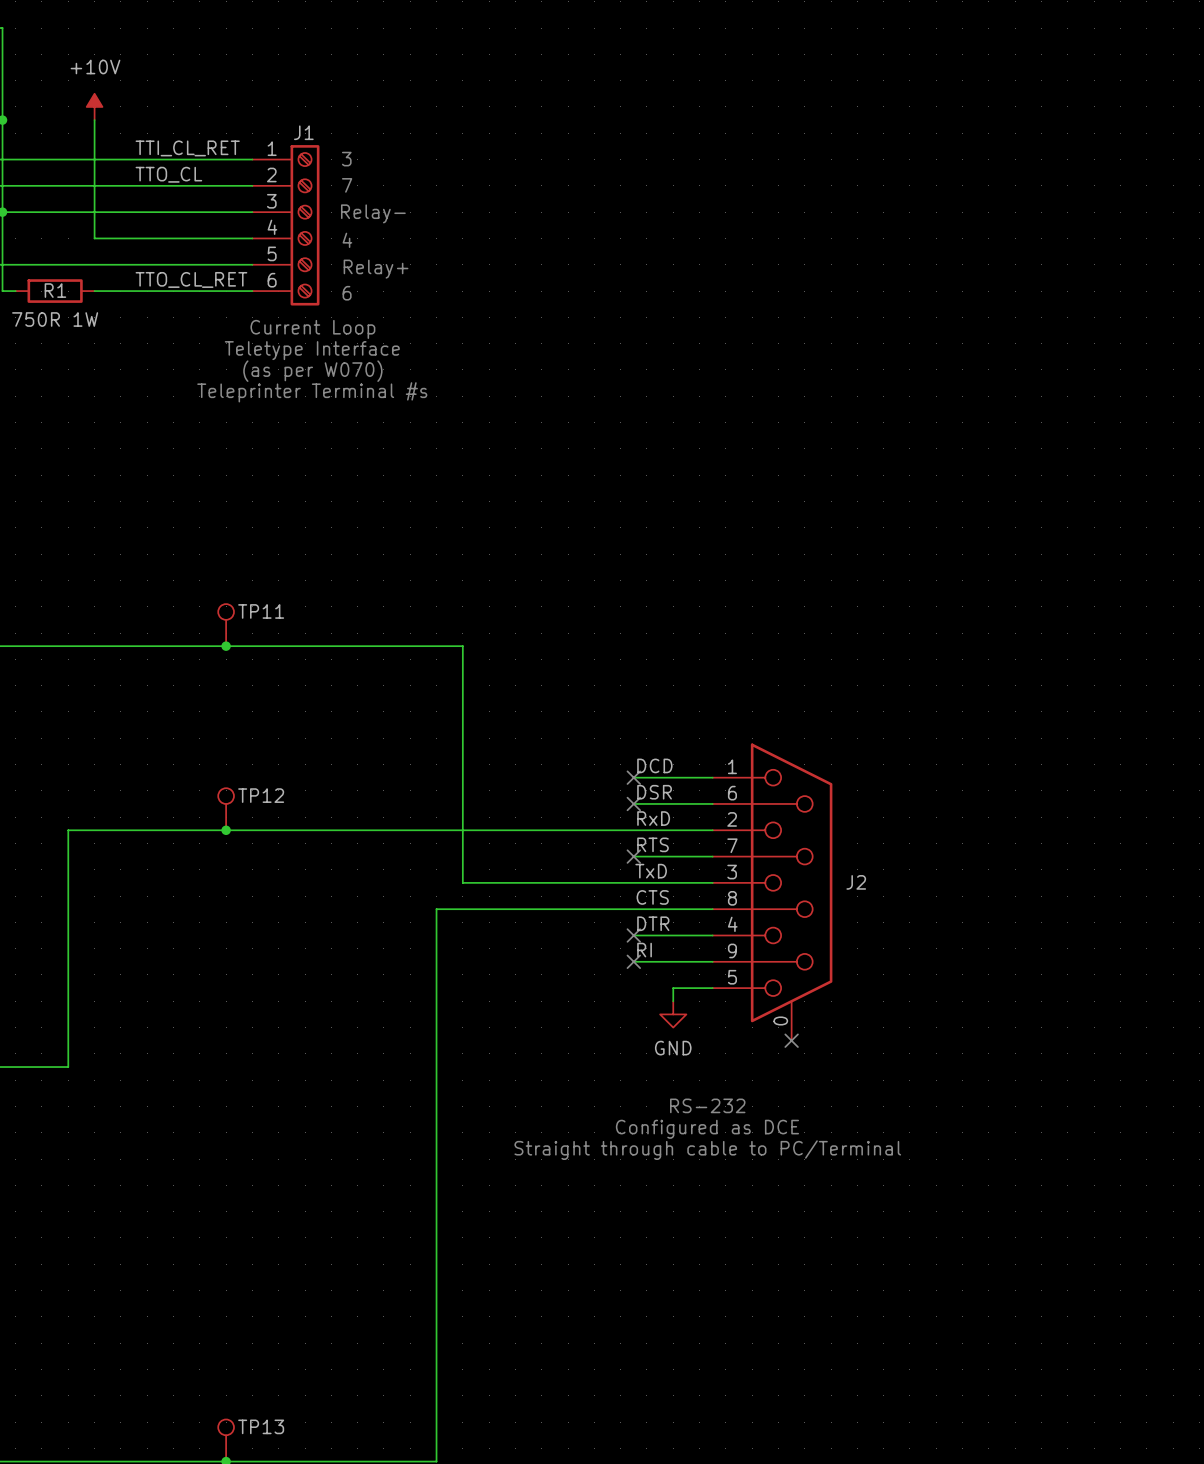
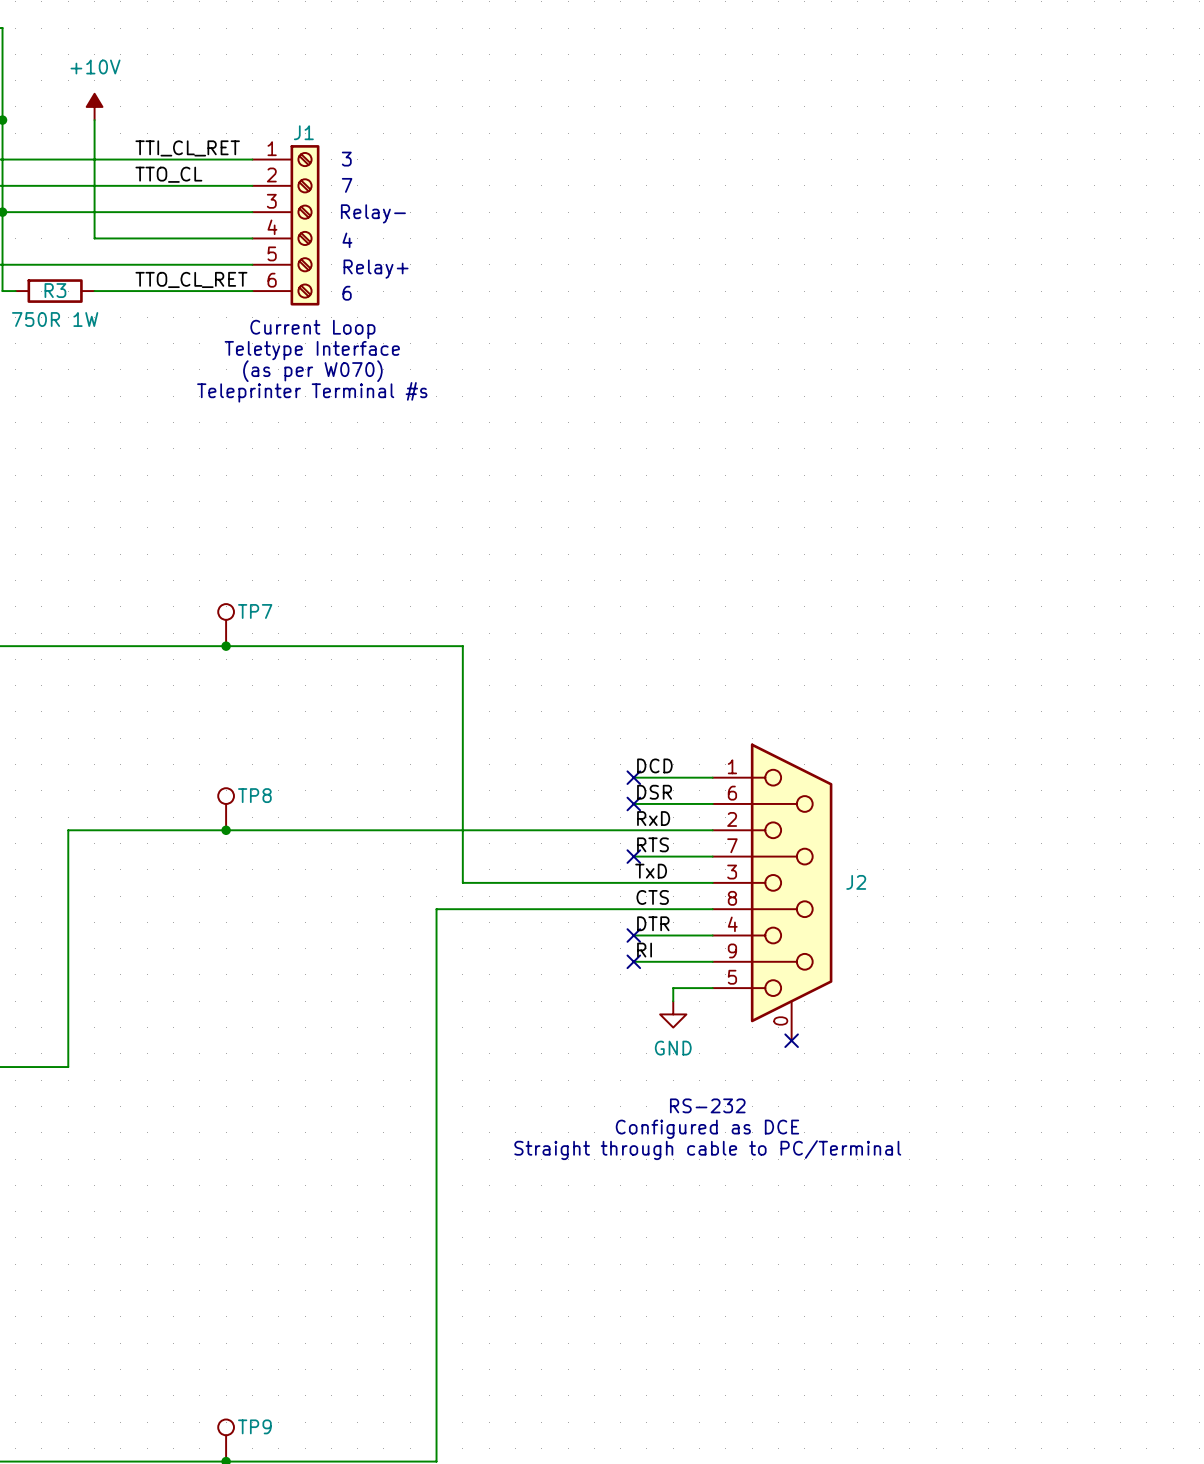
R1 name: R1 (55, 290) -> R3 (55, 290)
TP11 name: TP11 (261, 611) -> TP7 (255, 611)
TP12 name: TP12 (261, 795) -> TP8 (254, 795)
TP13 name: TP13 (261, 1426) -> TP9 (254, 1426)

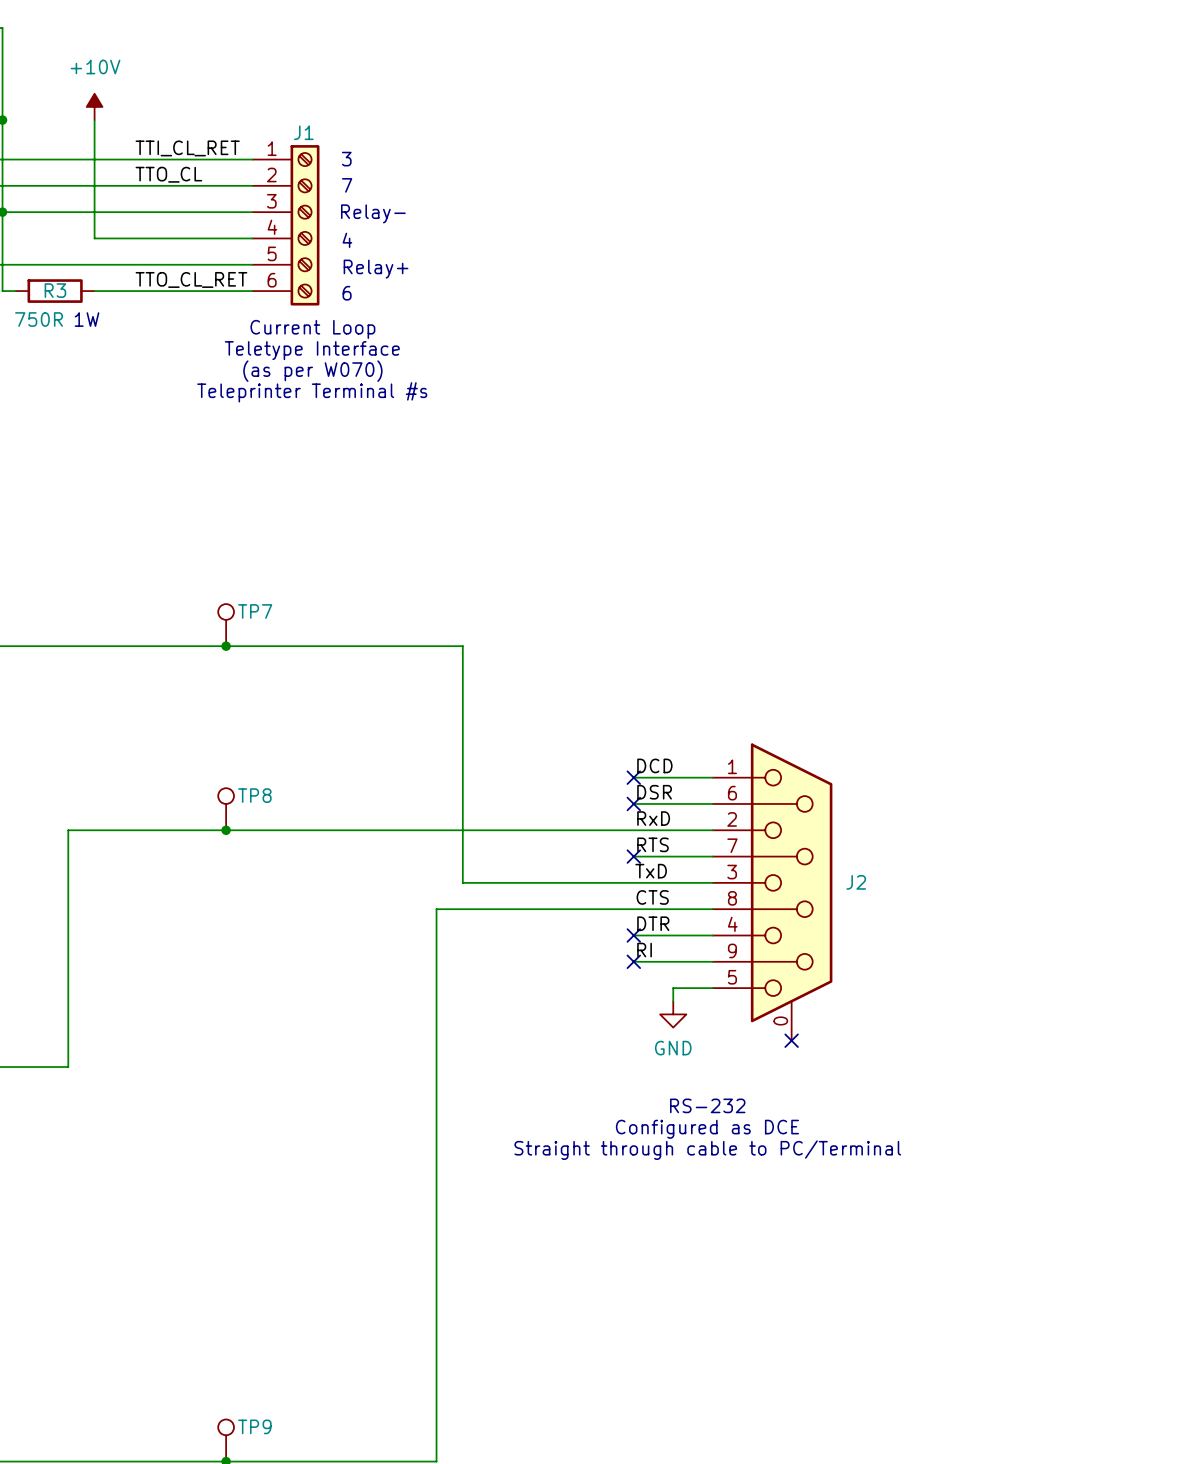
R3 value: 750R 1W (55, 319) -> 750R (39, 319)
text: none -> 1W (87, 319)

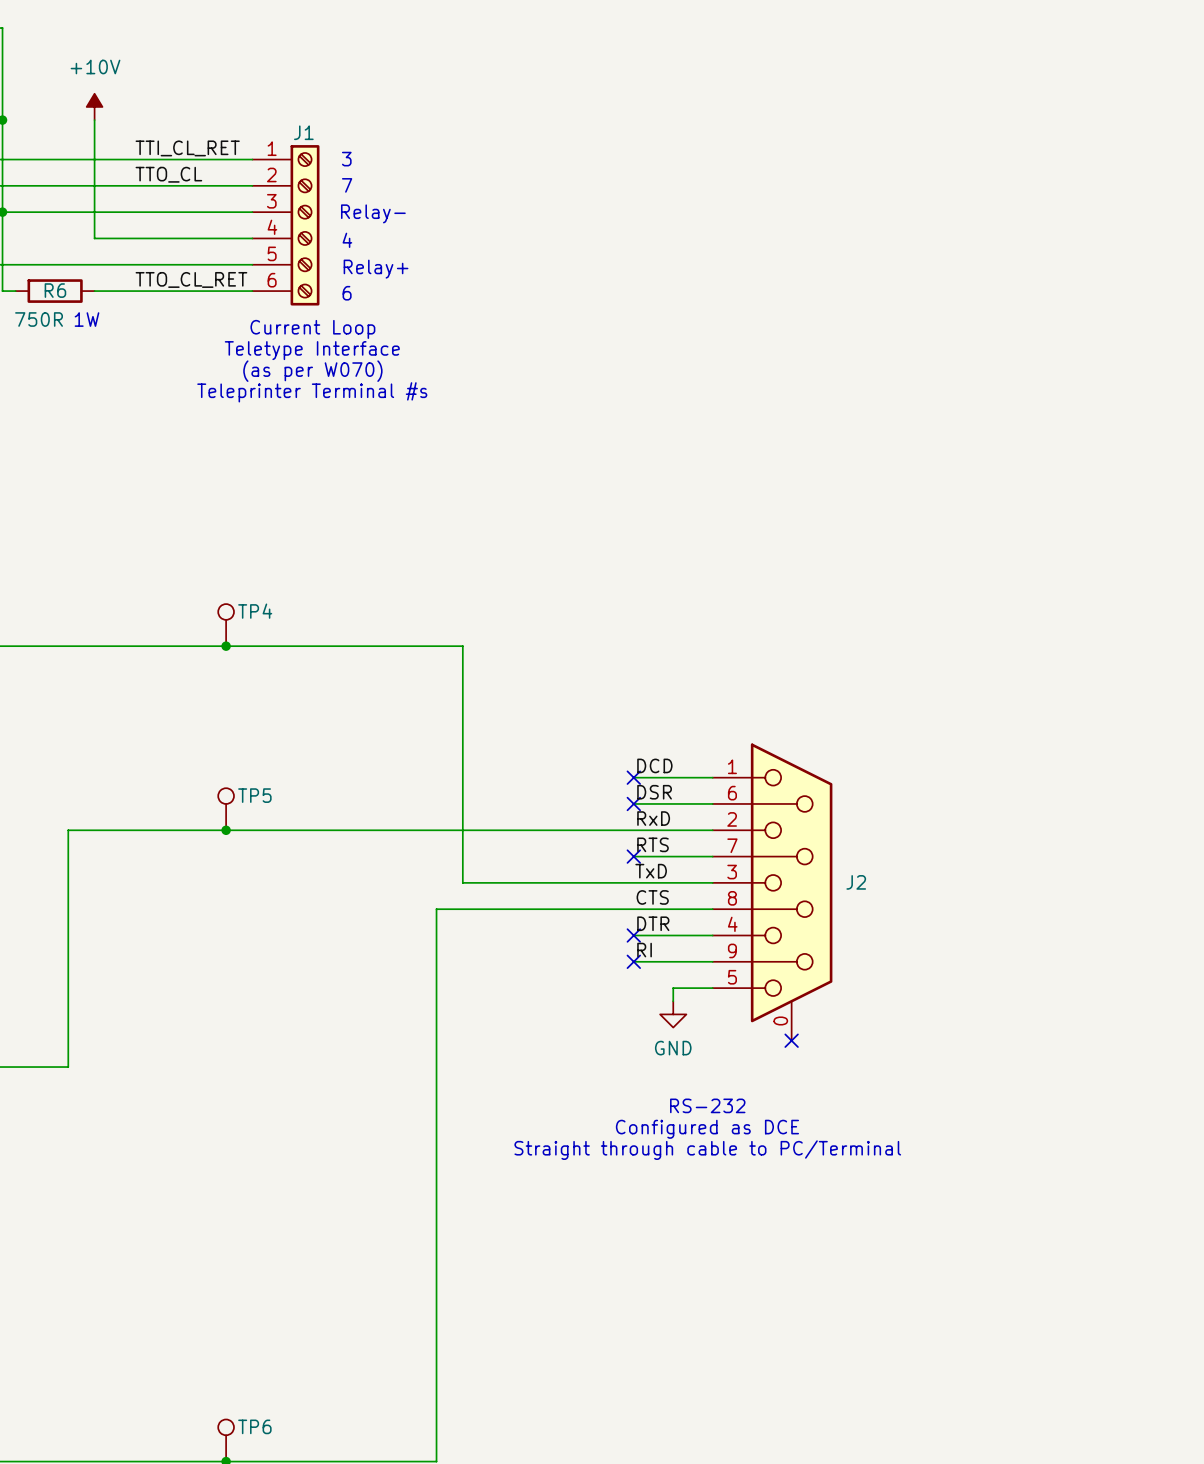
R3 name: R3 (55, 290) -> R6 (55, 290)
TP7 name: TP7 (255, 611) -> TP4 (255, 611)
TP8 name: TP8 (254, 795) -> TP5 (254, 795)
TP9 name: TP9 (254, 1426) -> TP6 (254, 1426)

